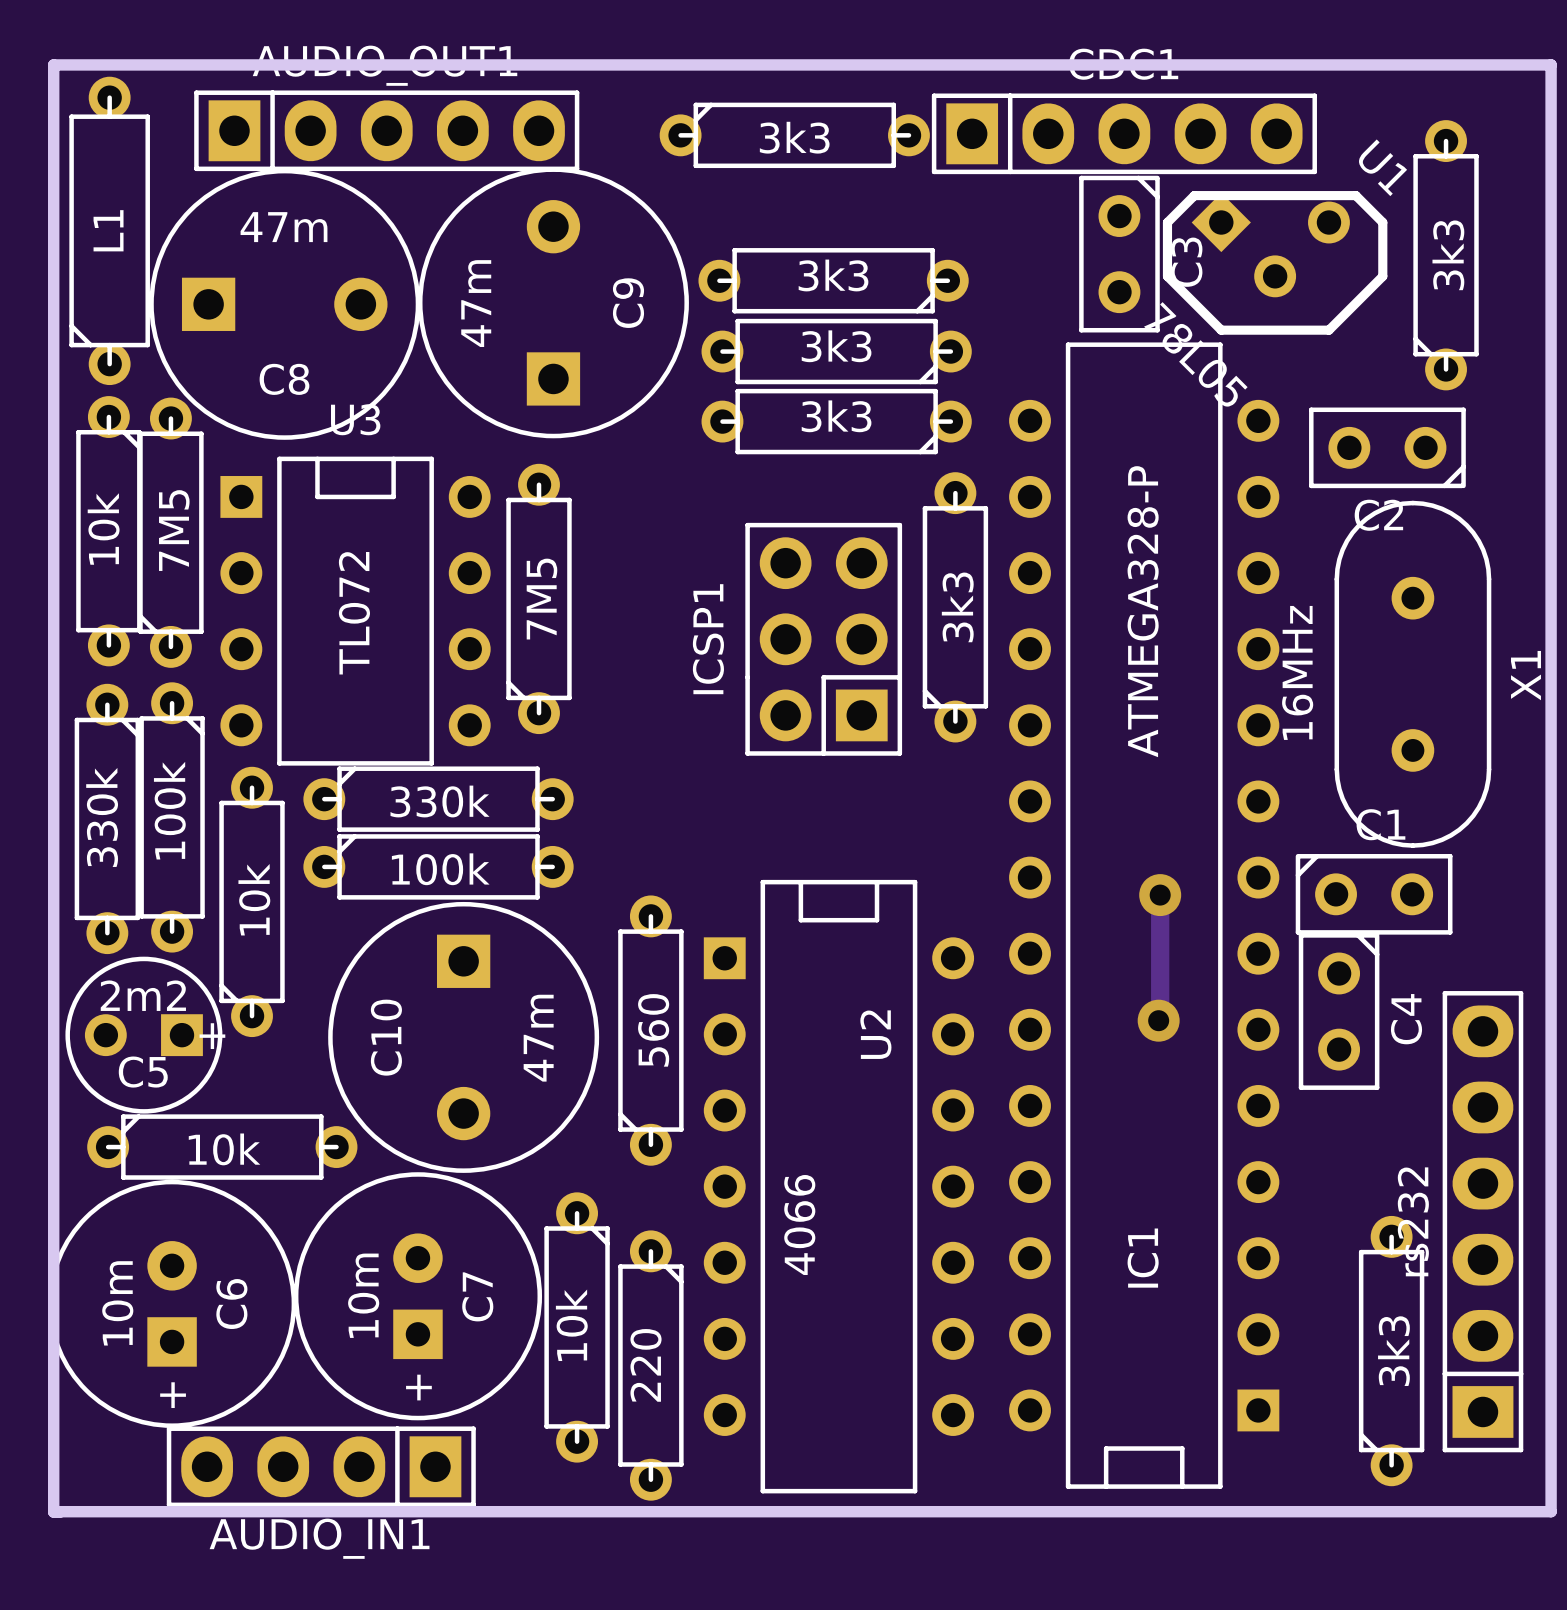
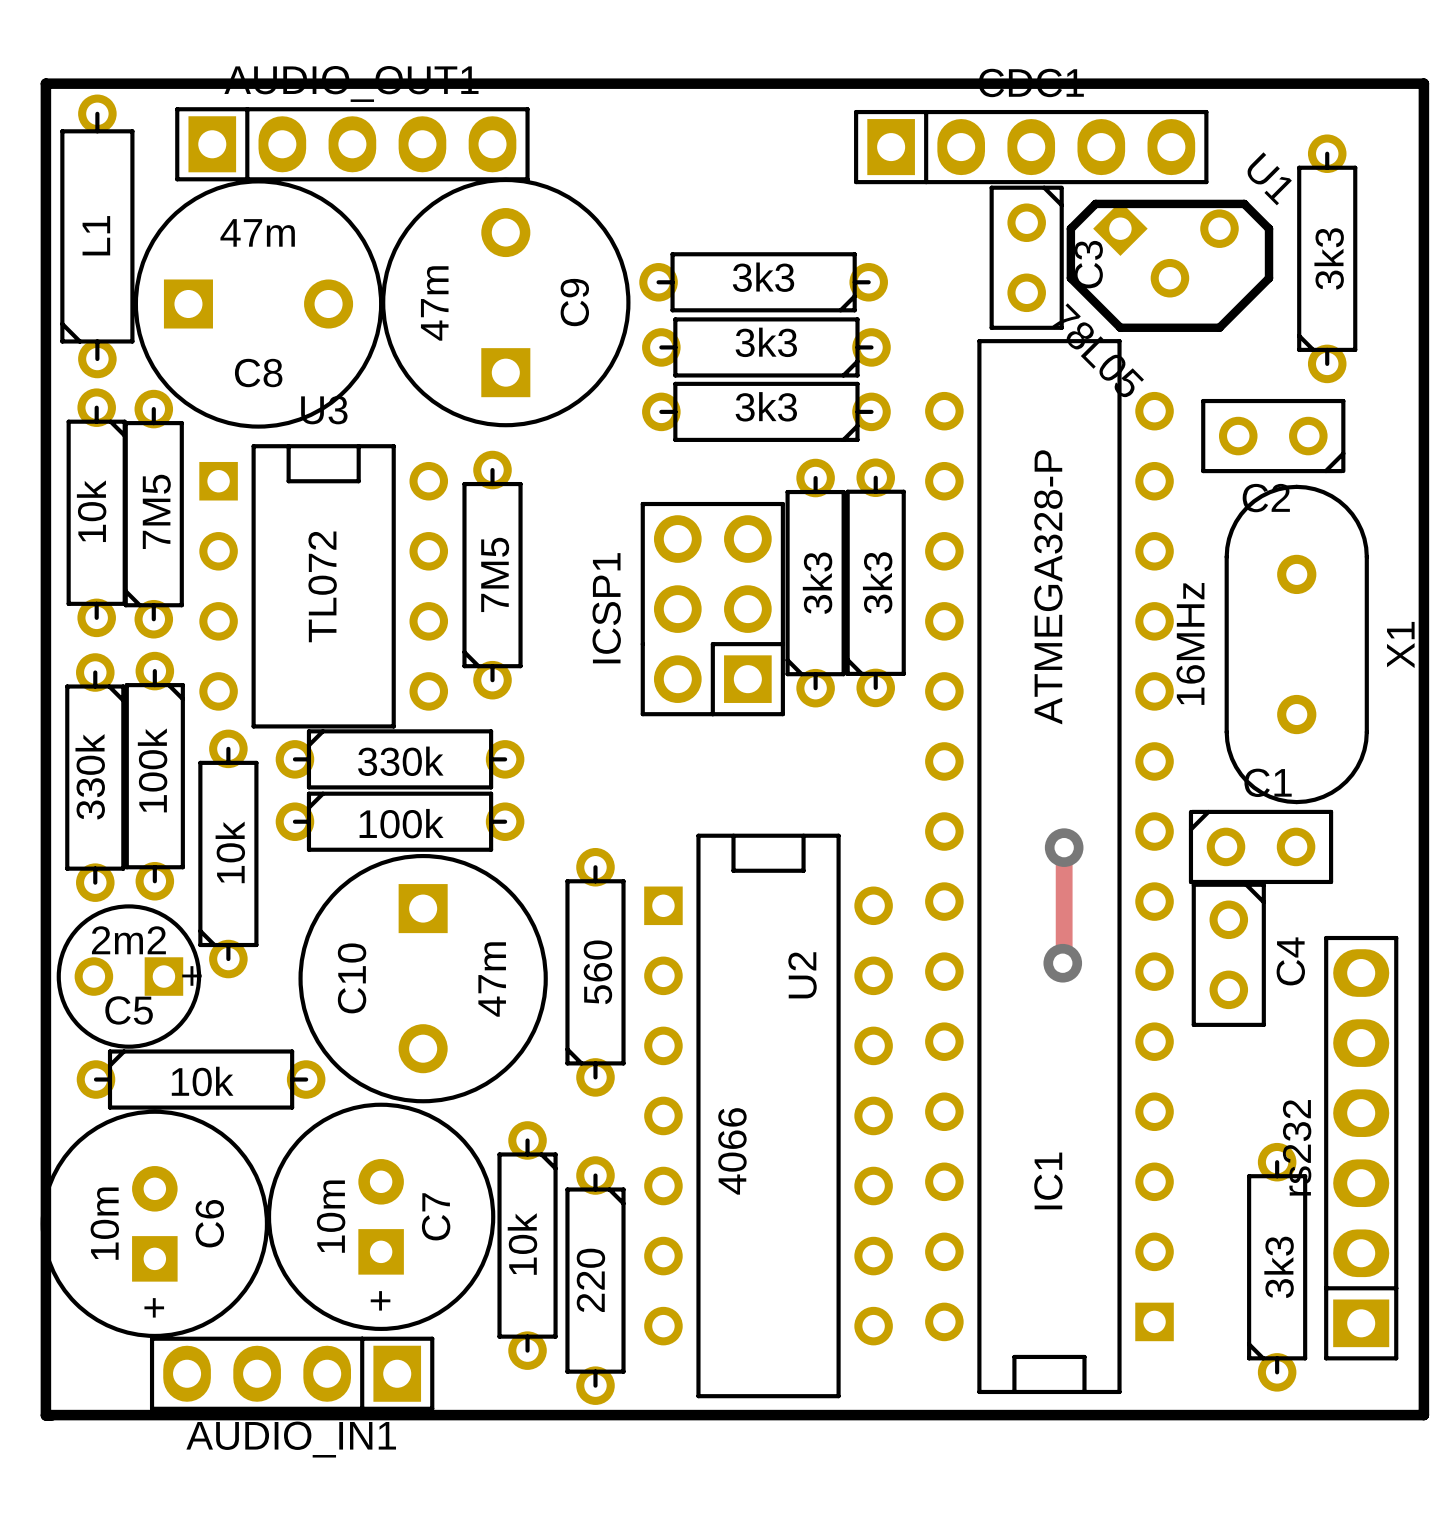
part rotation: 0° (794, 135) -> 90° counterclockwise (815, 583)
part position: (794, 135) -> (815, 583)
ICSP1 position: (823, 639) -> (712, 609)

